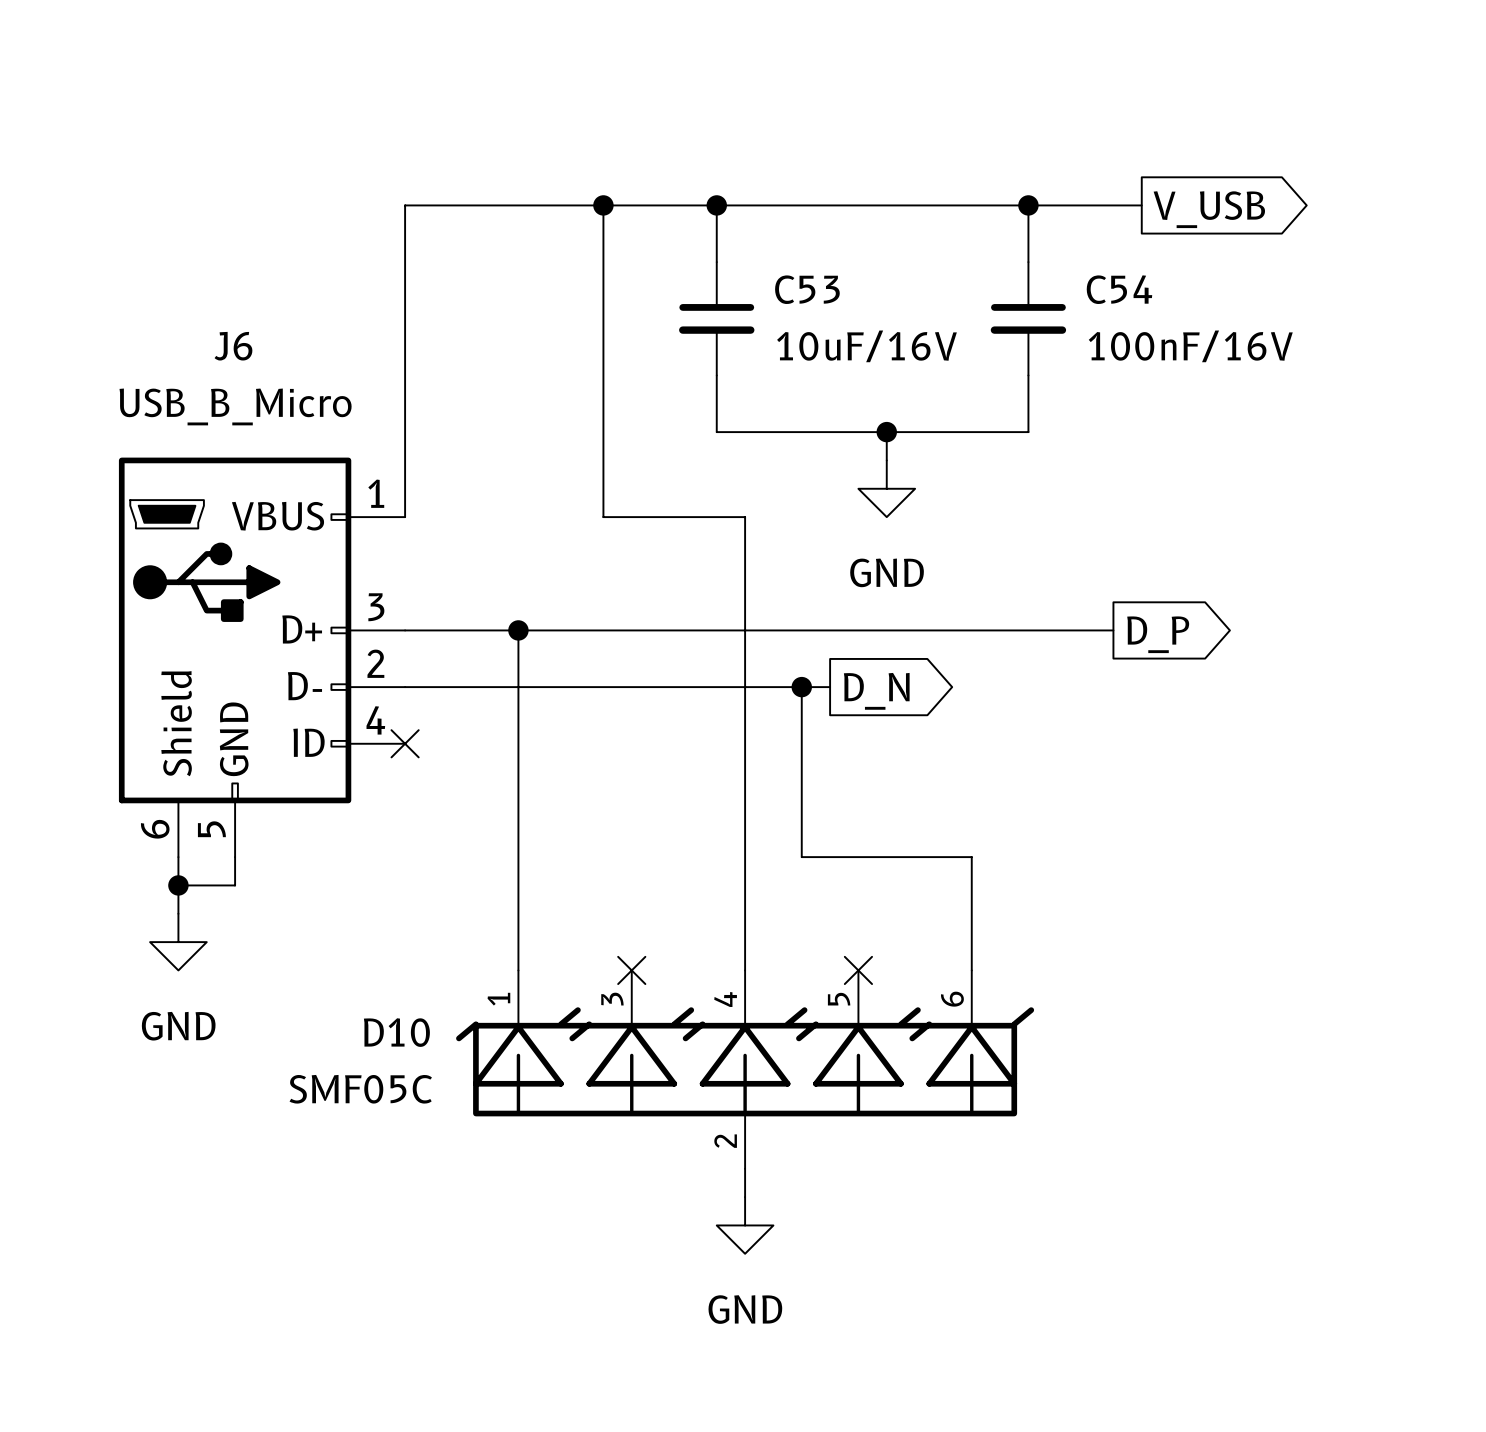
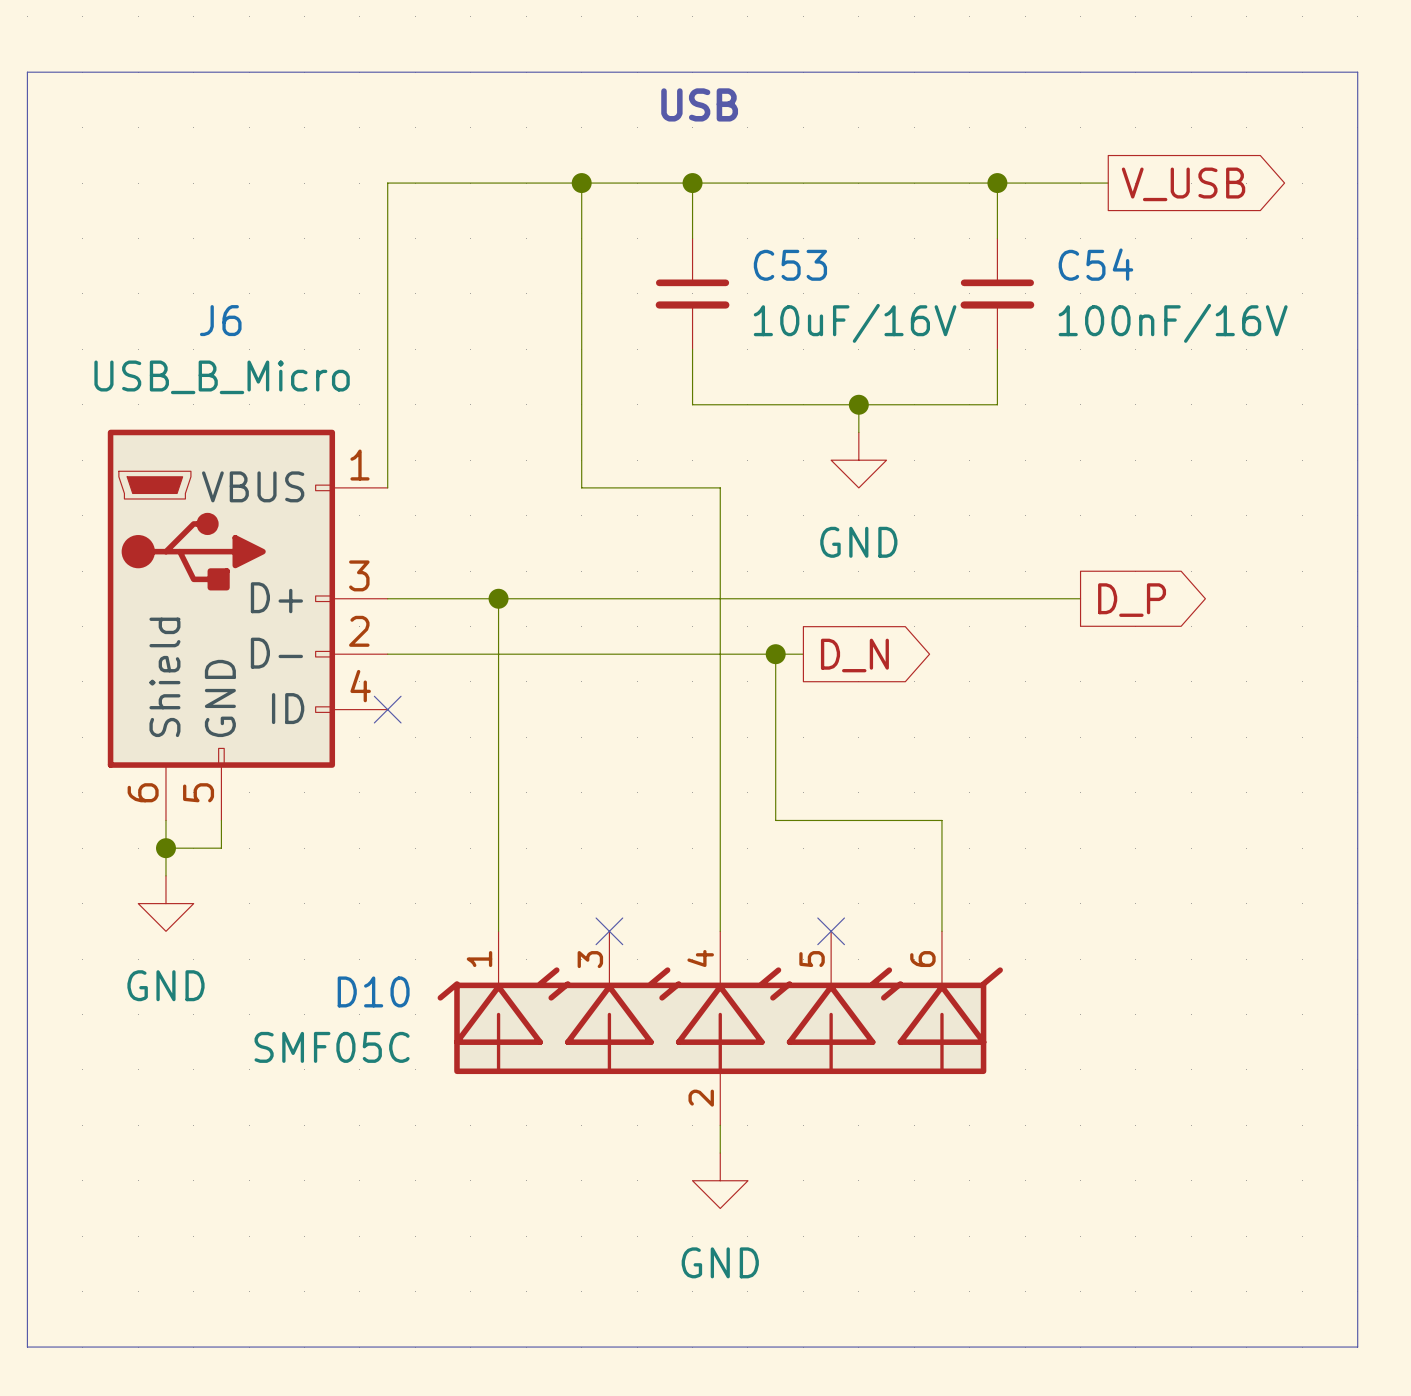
line: none -> (27, 72) (1357, 72) (1357, 1347) (27, 1347) (27, 72)
text: none -> USB (699, 104)

